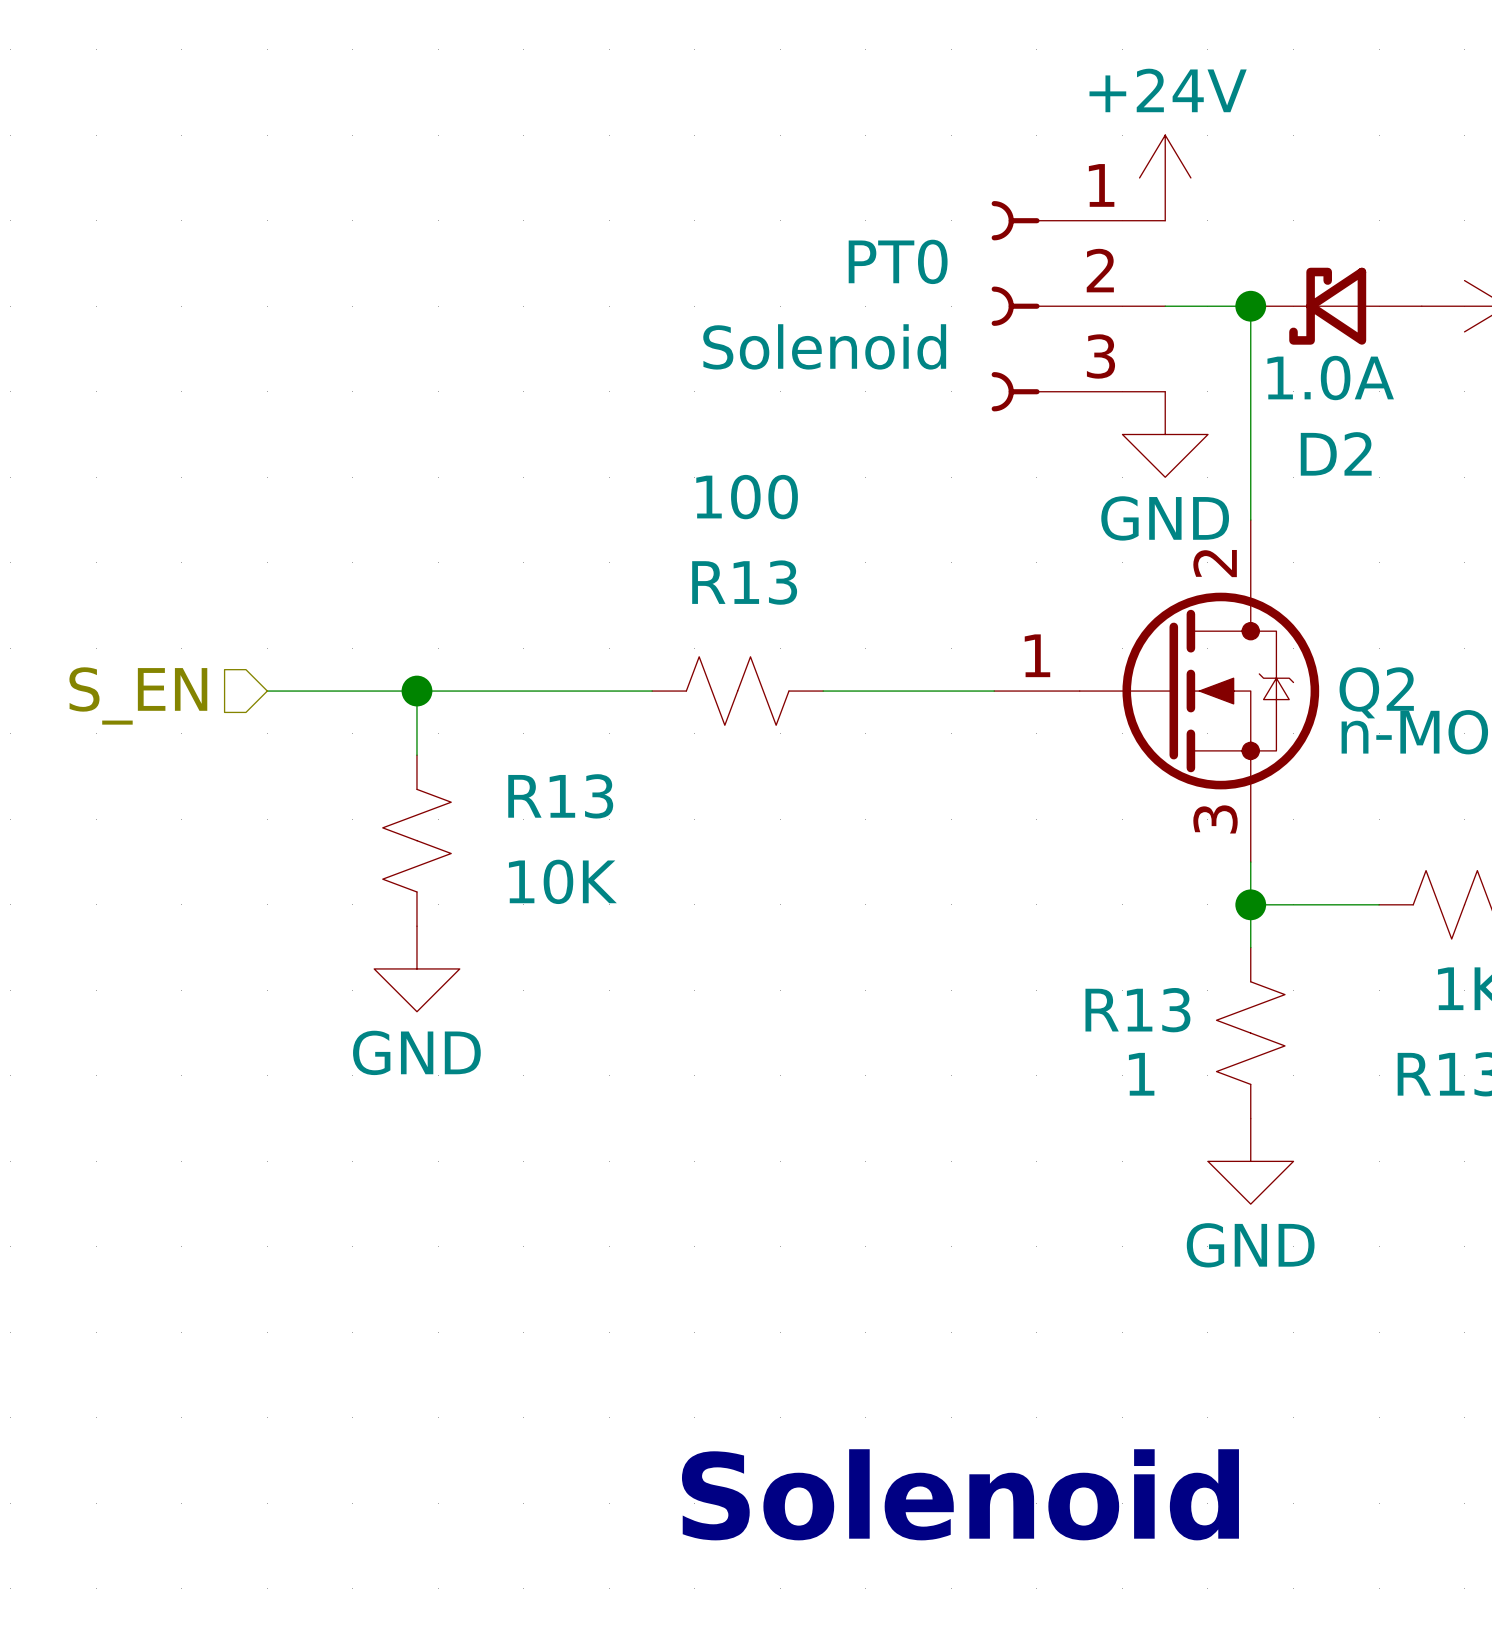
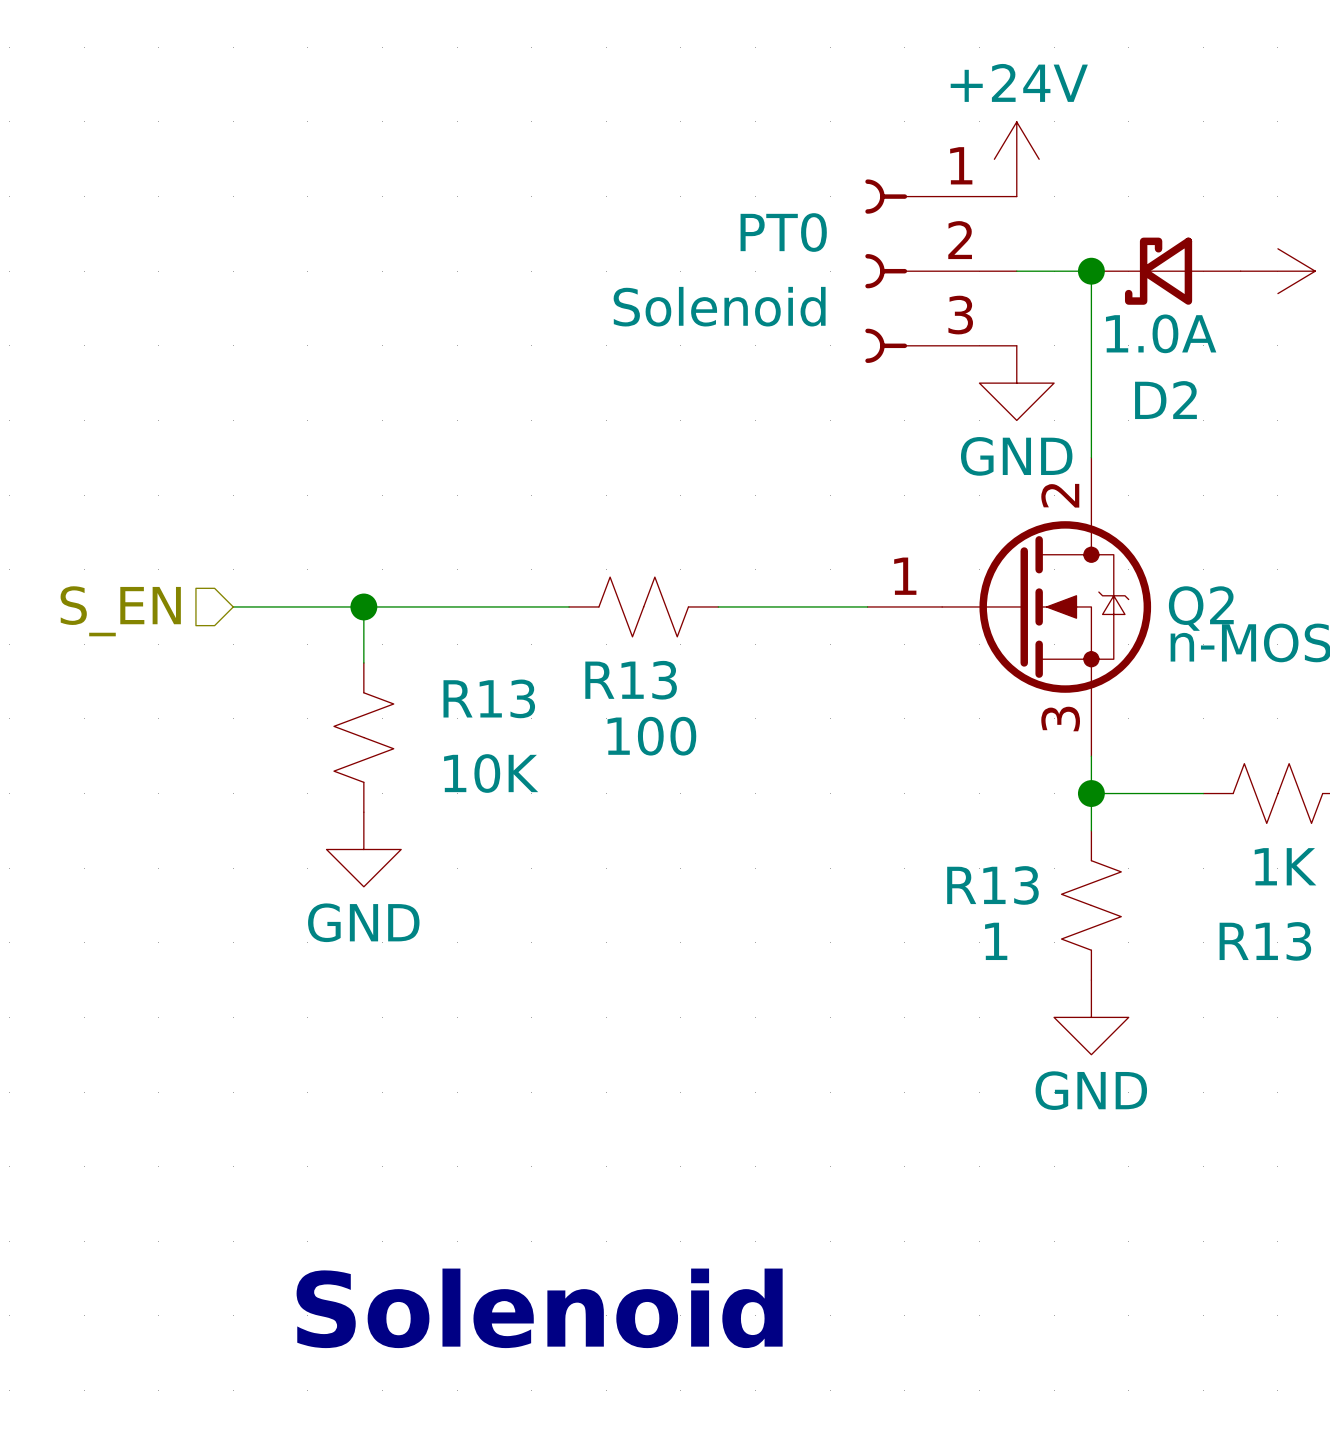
R13 value position: 100 (747, 497) -> 100 (651, 736)
R13 name position: R13 (744, 582) -> R13 (631, 680)
text position: Solenoid (960, 1494) -> Solenoid (539, 1308)

